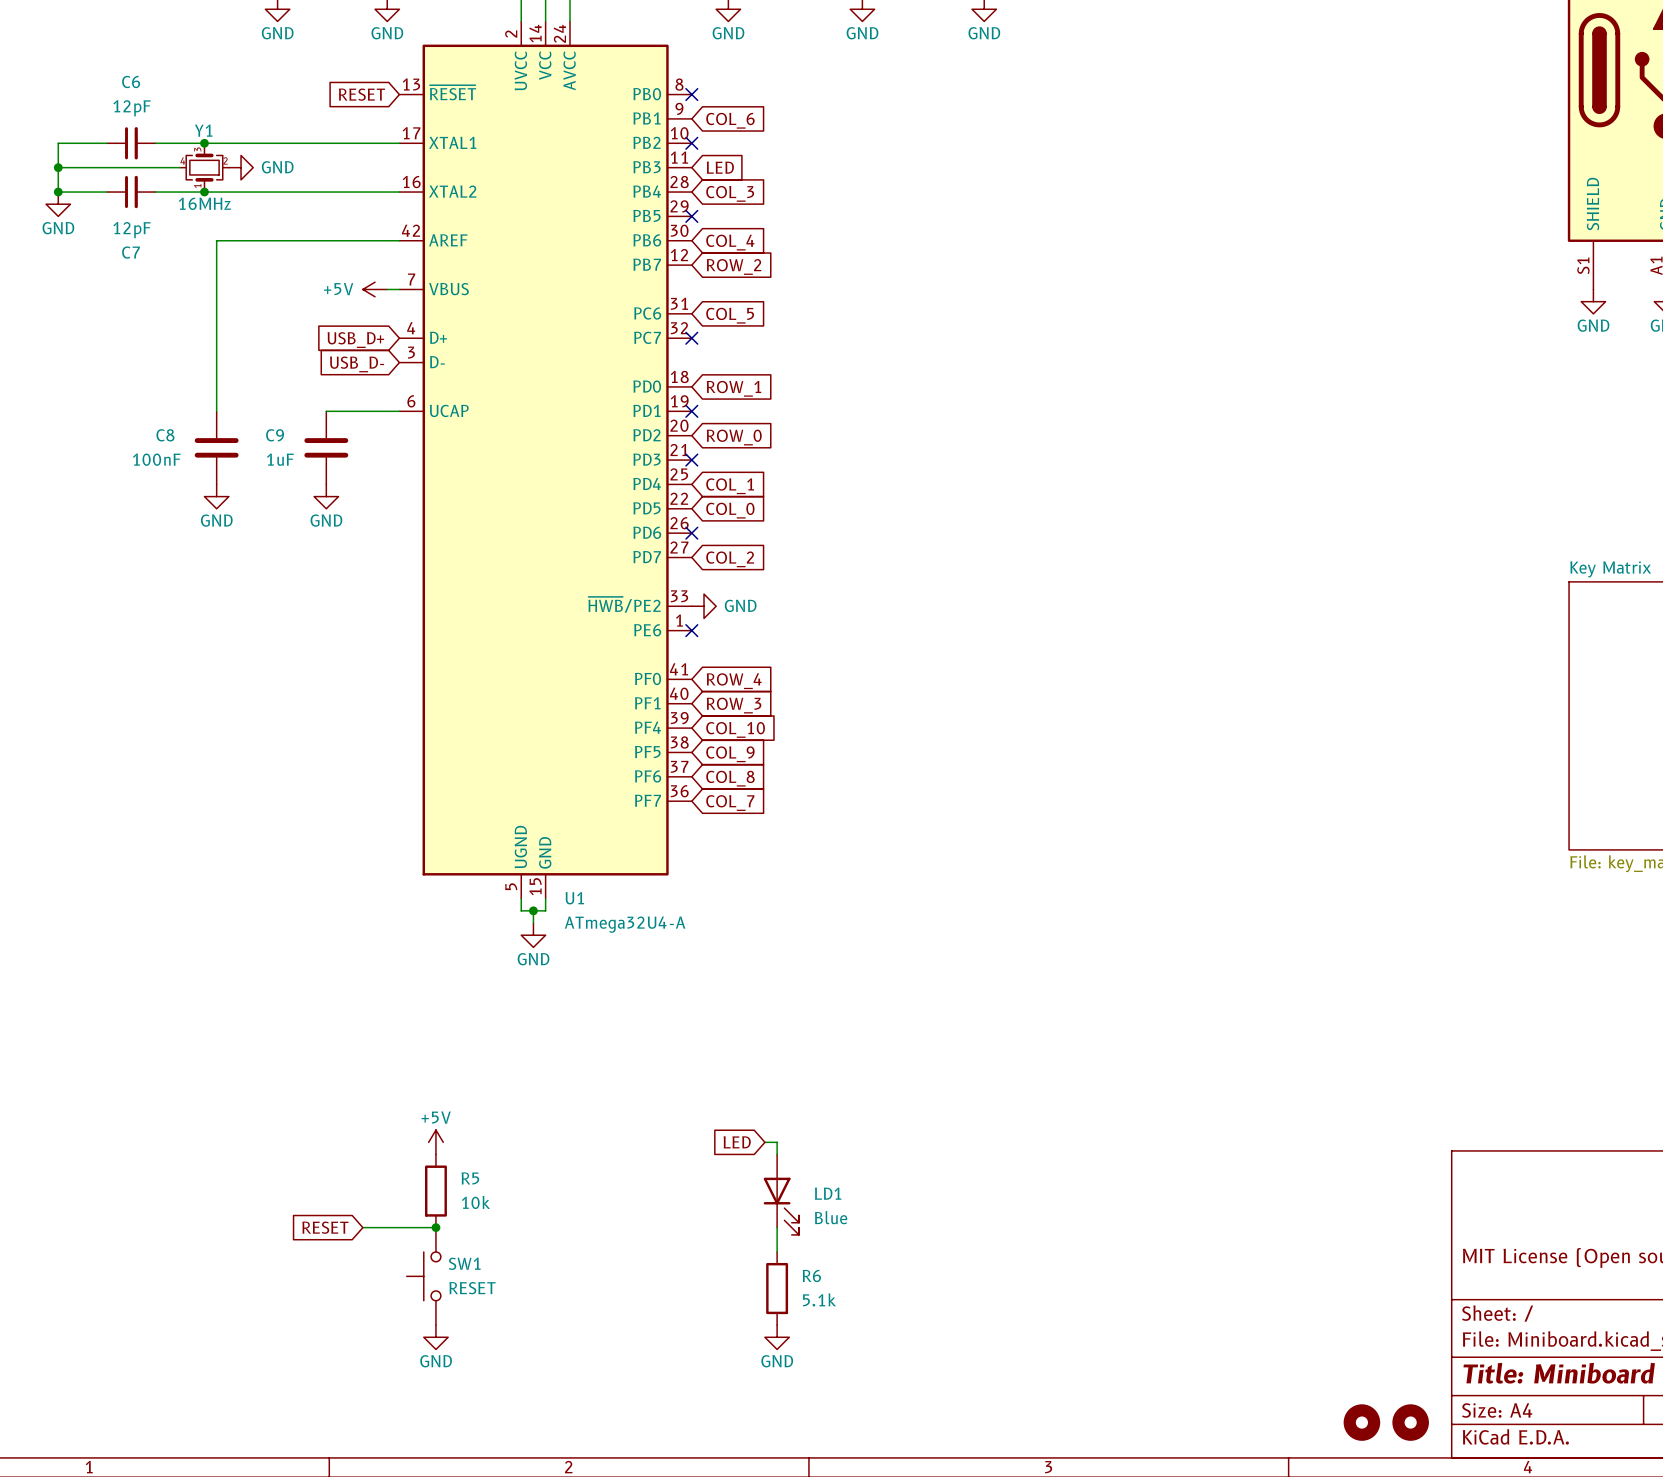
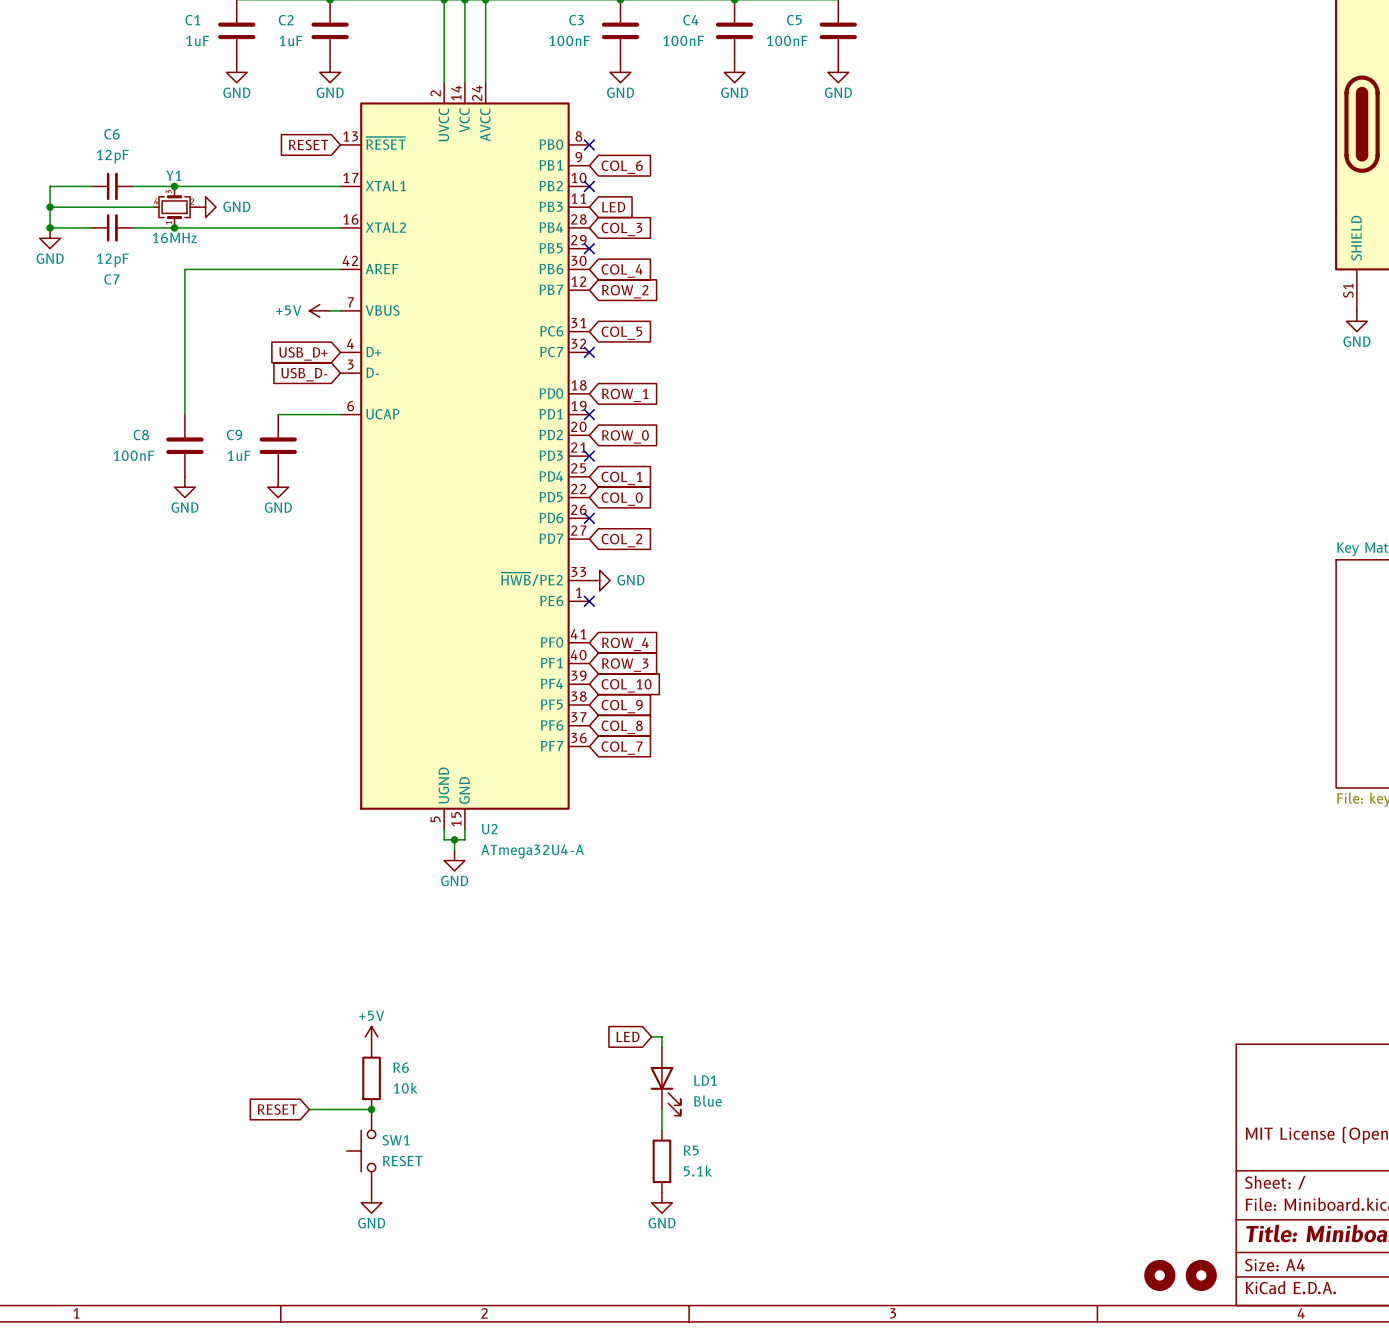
U1 name: U1 (574, 898) -> U2 (489, 829)
R5 name: R5 (470, 1178) -> R6 (401, 1067)
R6 name: R6 (811, 1275) -> R5 (691, 1150)

